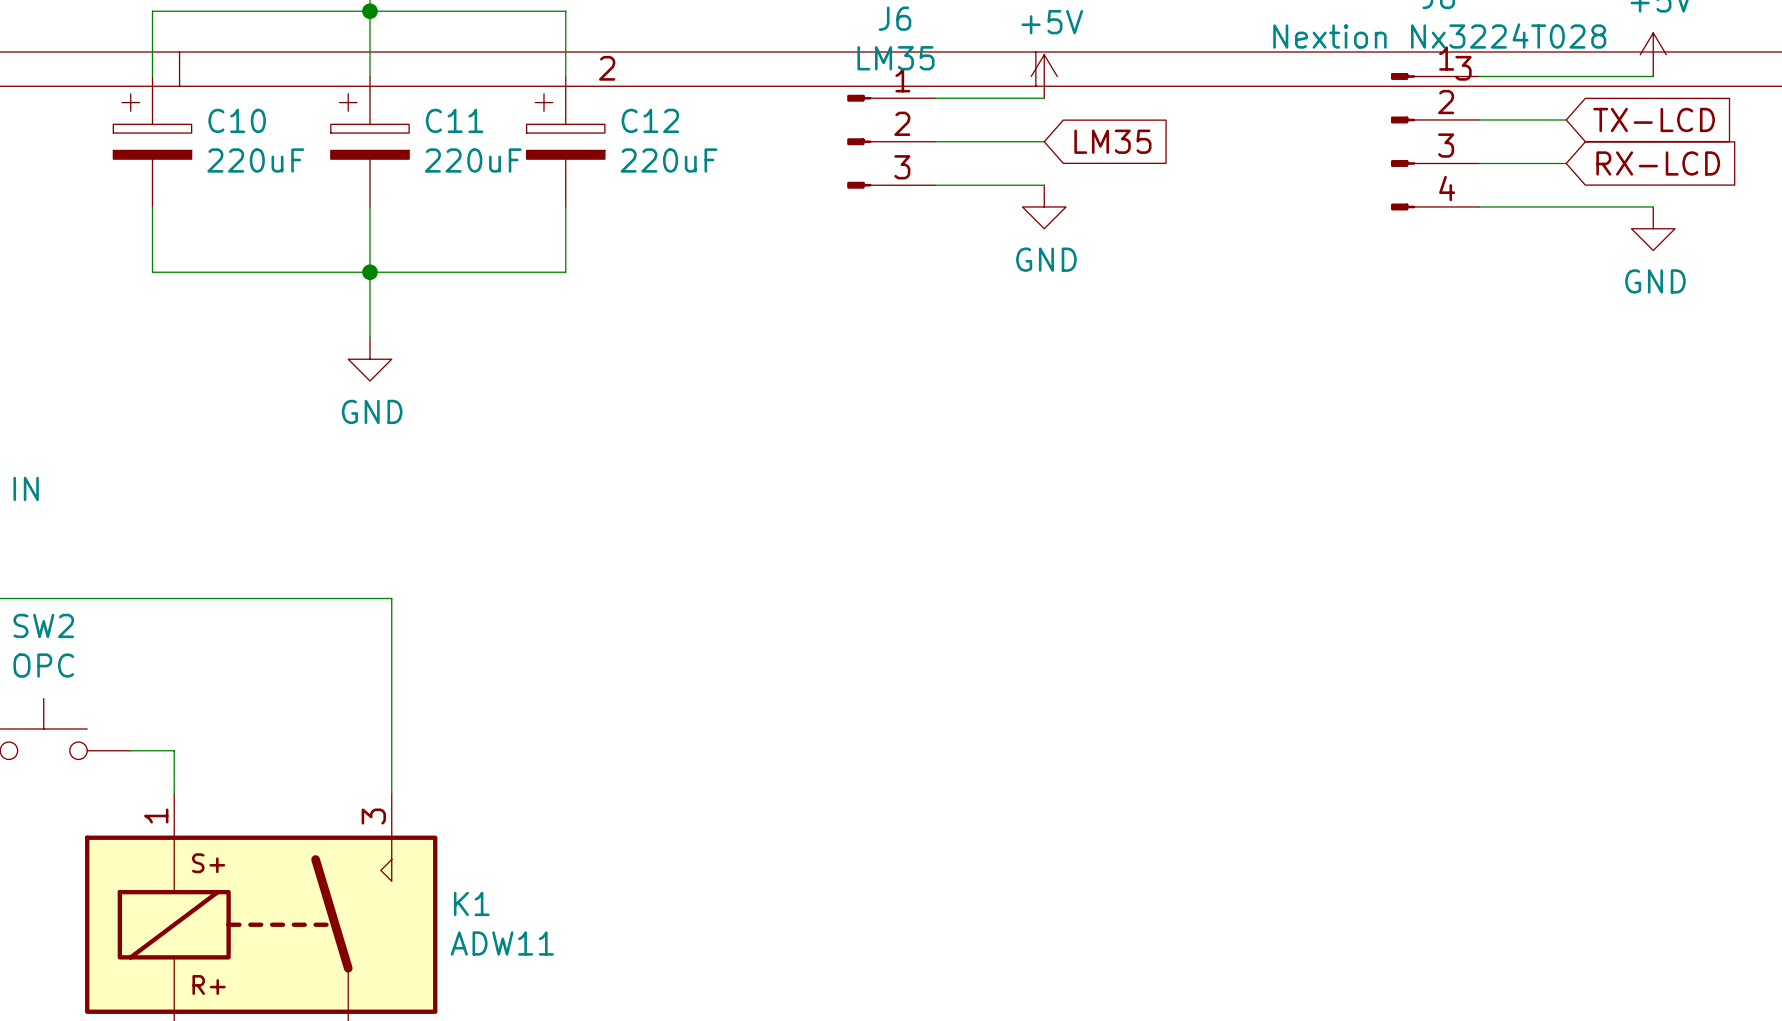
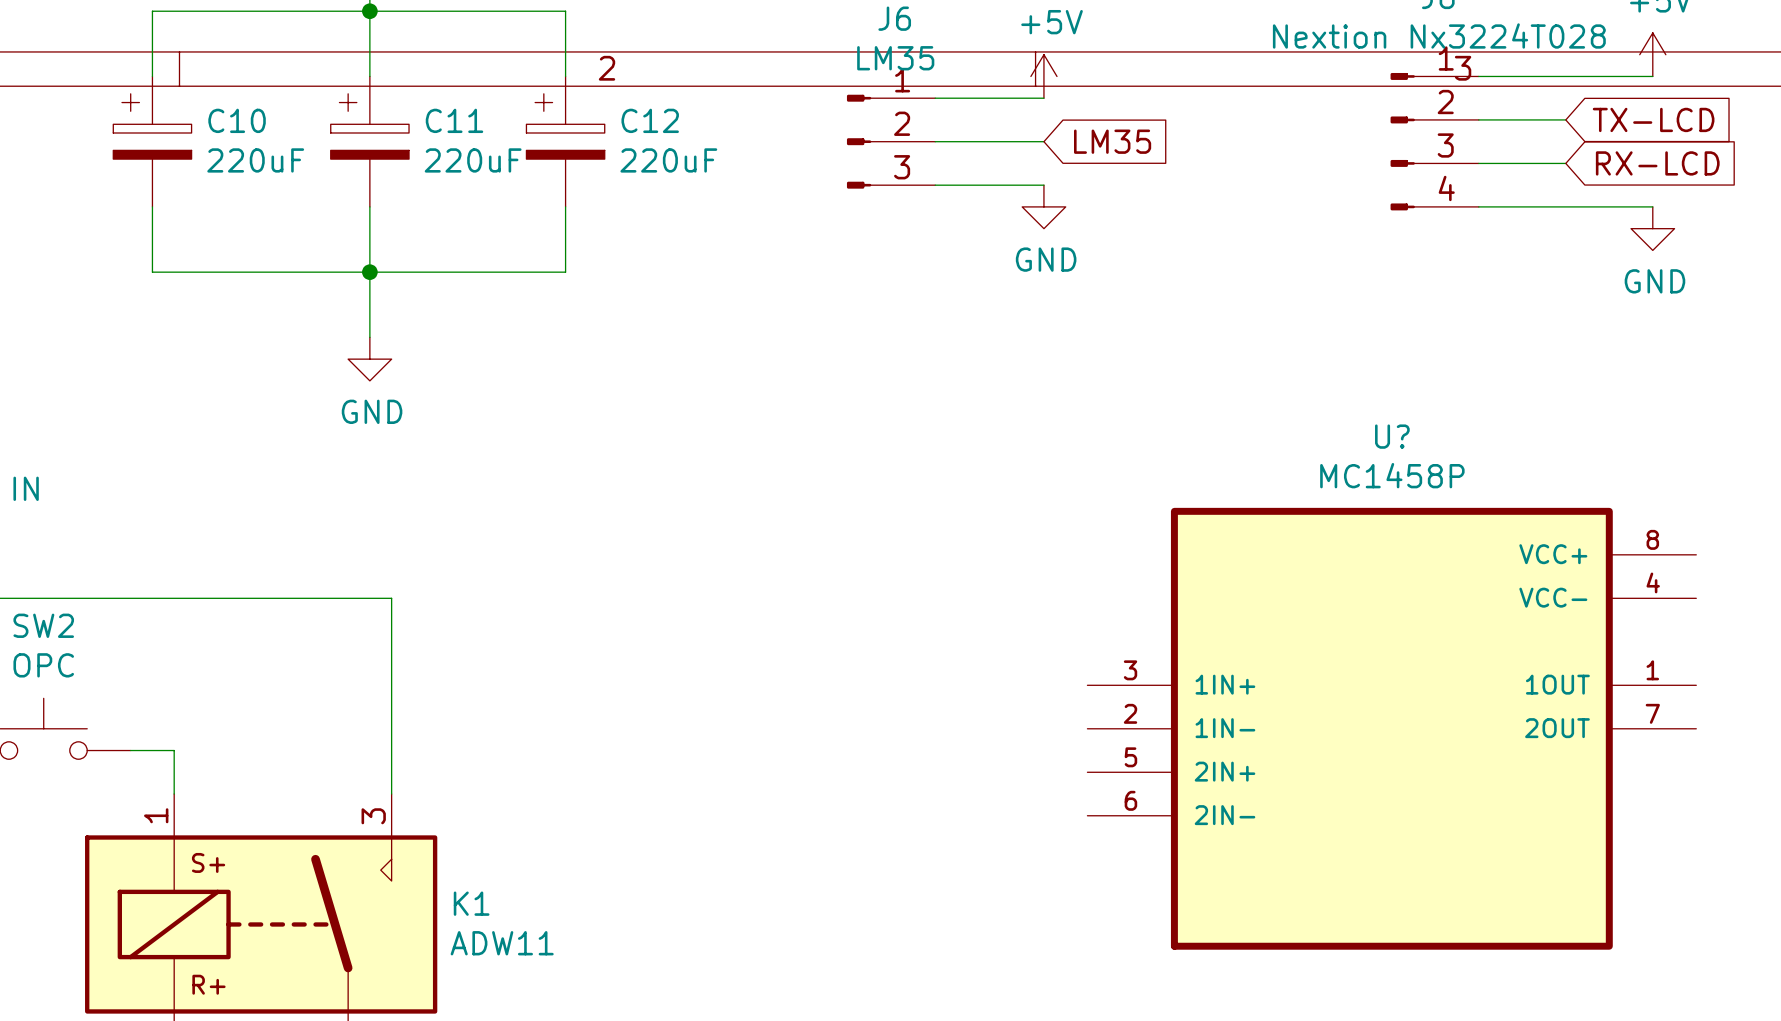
U?: none -> MC1458P (1391, 728)

